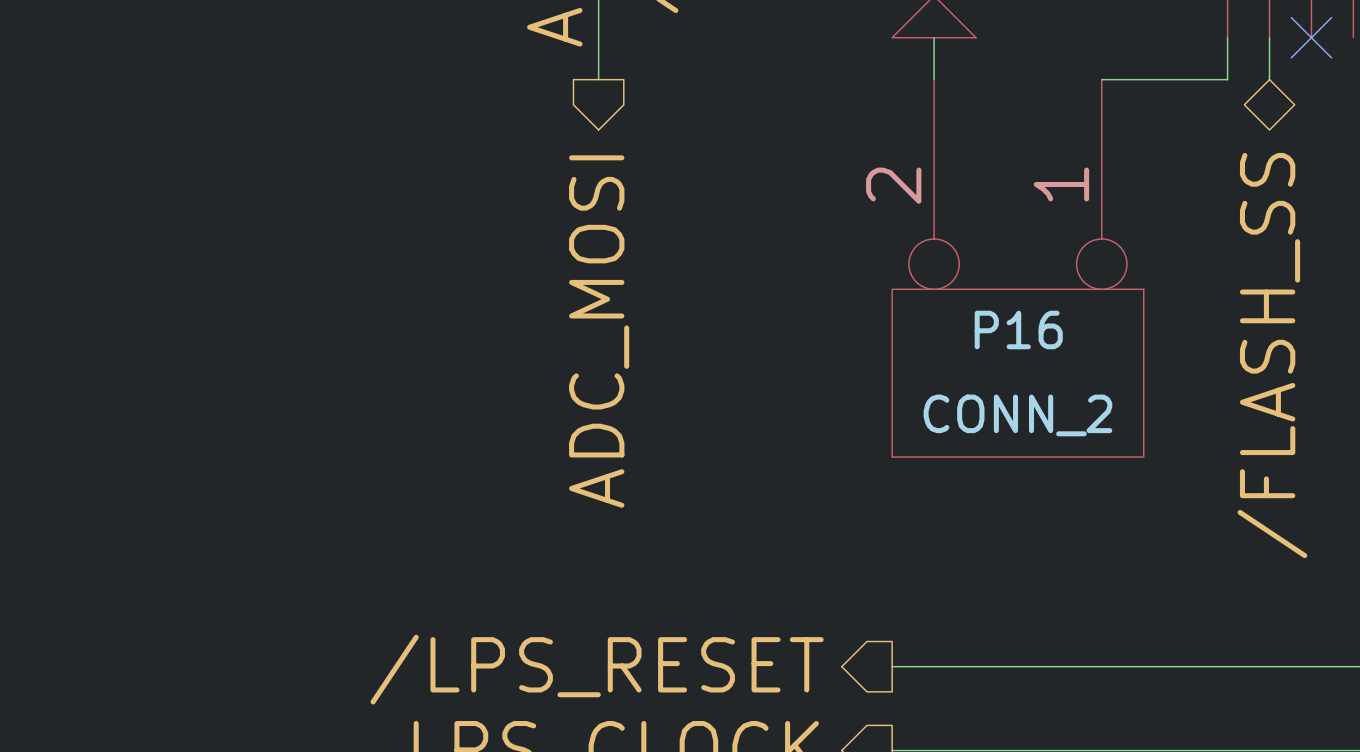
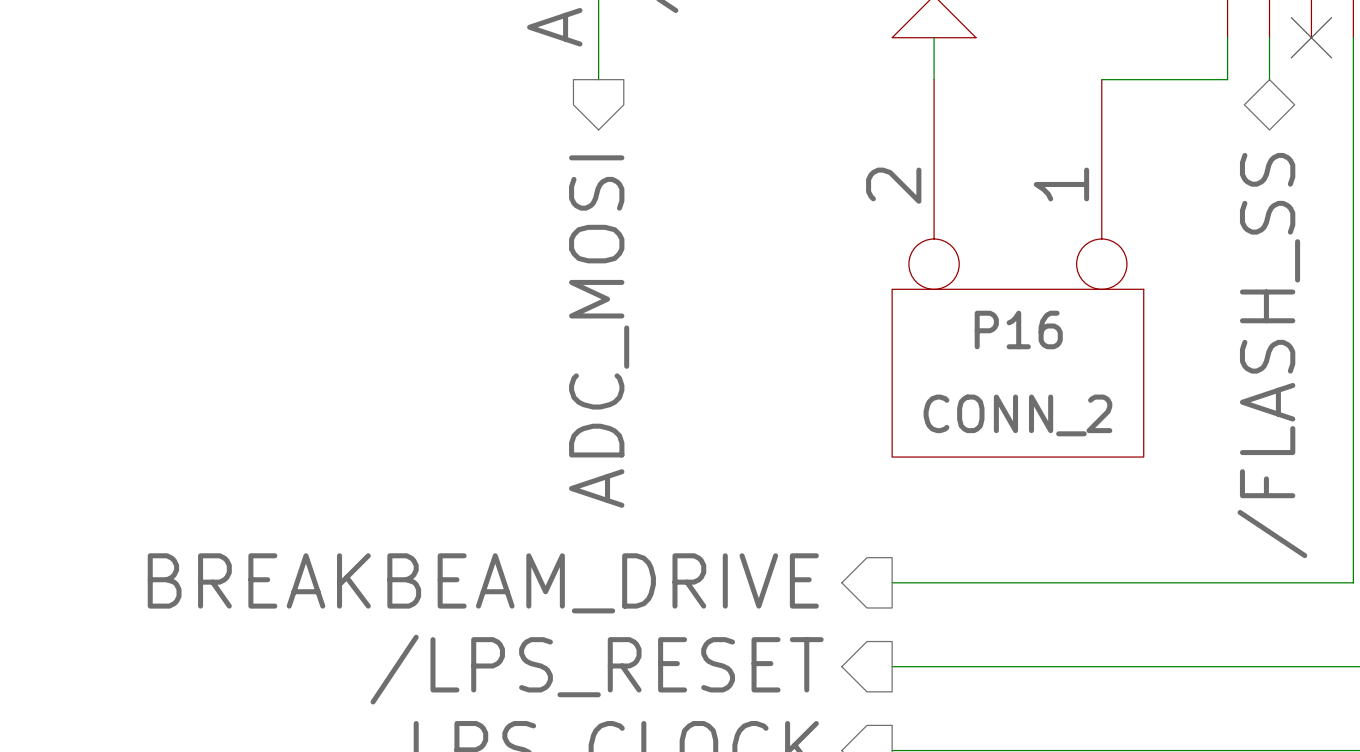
wire: none -> (1353, 37) (1353, 582) (892, 582)
hierarchical label: none -> BREAKBEAM_DRIVE (483, 583)

